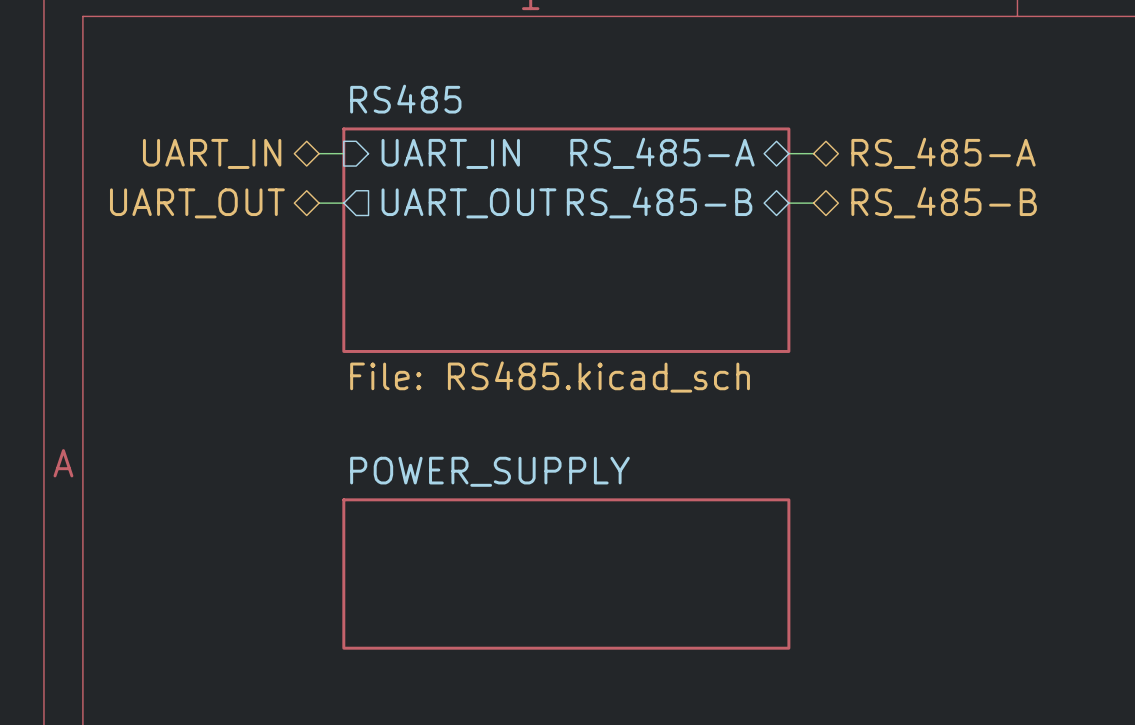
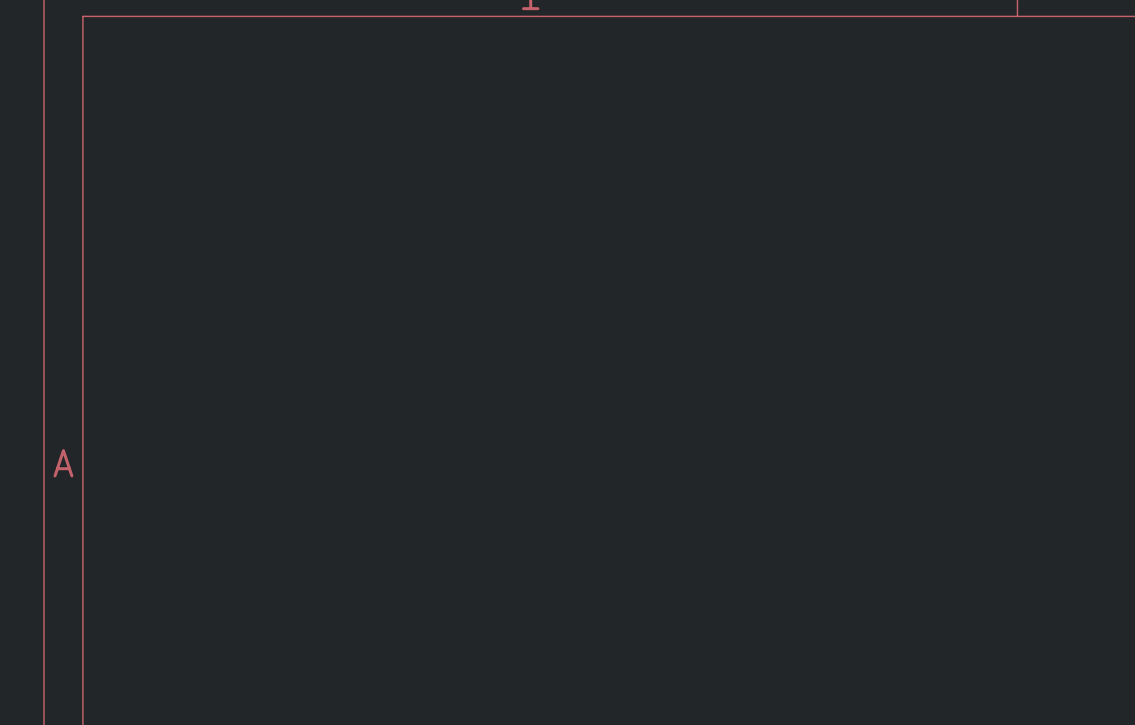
hierarchical label: UART_IN (212, 153) -> none
wire: (319, 153) (343, 153) -> none
sheet pin: UART_IN (450, 153) -> none
sheet pin: RS_485-A (662, 153) -> none
wire: (788, 153) (813, 153) -> none
hierarchical label: RS_485-A (943, 153) -> none
sheet pin: RS_485-B (659, 202) -> none
hierarchical label: RS_485-B (944, 202) -> none
hierarchical label: UART_OUT (197, 203) -> none
wire: (319, 203) (343, 203) -> none
sheet pin: UART_OUT (469, 203) -> none
wire: (788, 203) (813, 203) -> none
sheet RS485: File: RS485.kicad_sch (566, 240) -> none
sheet POWER_SUPPLY: (566, 574) -> none

